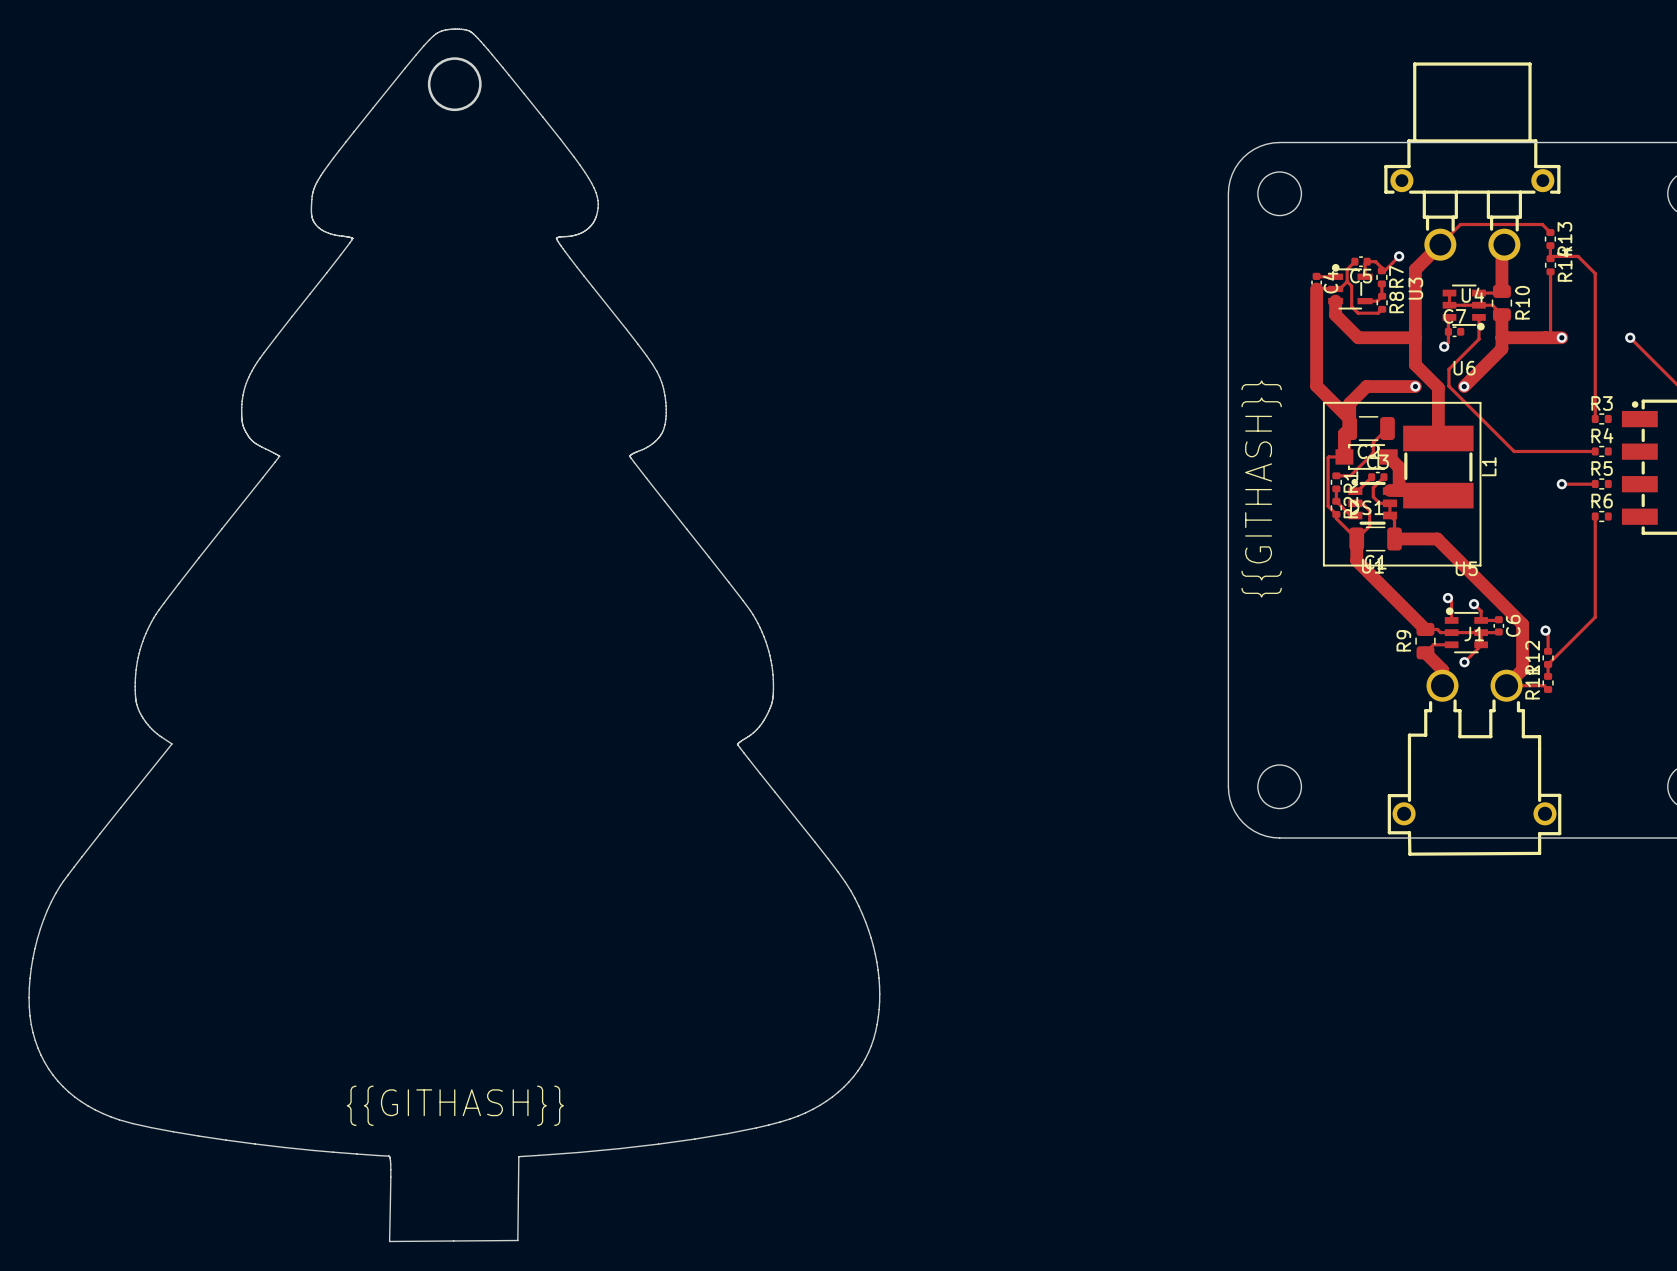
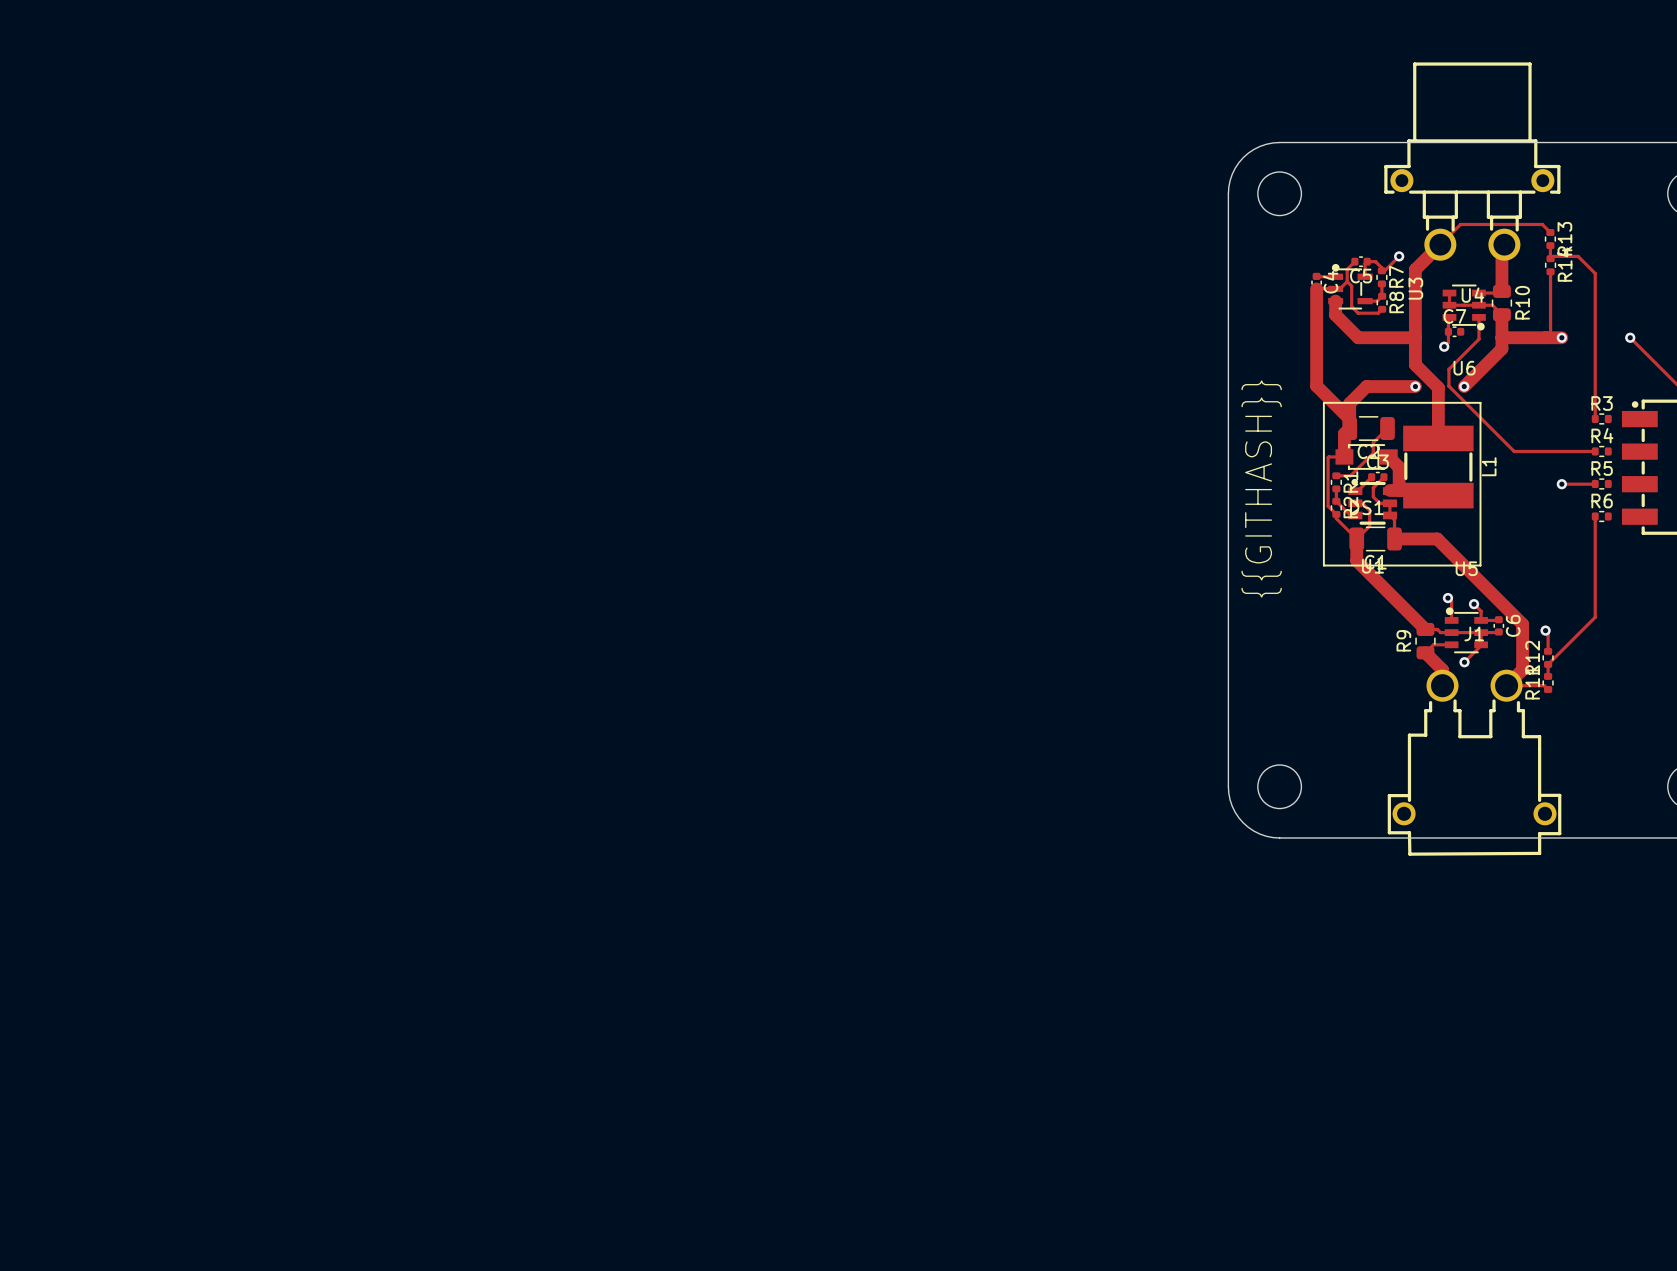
round board edge: [427, 57, 482, 112] -> none
board edge: (352, 238) (326, 232) (314, 222) (311, 215) (311, 205) (316, 183) (339, 150) (423, 46) (437, 33) (455, 29) (469, 31) (484, 45) (560, 139) (594, 188) (598, 207) (592, 224) (579, 233) (556, 238) -> none
board edge: (352, 238) (260, 358) (245, 386) (241, 410) (244, 429) (254, 442) (279, 456) -> none
board edge: (556, 238) (646, 355) (661, 382) (666, 406) (663, 429) (653, 443) (629, 455) -> none
board edge: (279, 456) (170, 594) (149, 625) (137, 661) (135, 682) (136, 702) (147, 724) (172, 743) (60, 885) (47, 910) (37, 938) (31, 968) (29, 997) (31, 1024) (35, 1040) (41, 1055) (52, 1074) (68, 1091) (87, 1105) (119, 1119) (173, 1131) (284, 1147) (389, 1156) (390, 1169) (389, 1241) (517, 1240) (518, 1156) (619, 1148) (694, 1139) (768, 1124) (812, 1109) (832, 1096) (848, 1082) (861, 1064) (871, 1045) (877, 1024) (879, 1001) (879, 978) (875, 954) (862, 914) (845, 882) (737, 744) -> none
board edge: (629, 456) (743, 600) (755, 619) (764, 636) (772, 670) (772, 702) (758, 727) (737, 743) -> none
text: {{GITHASH}} (455, 1105) -> none

